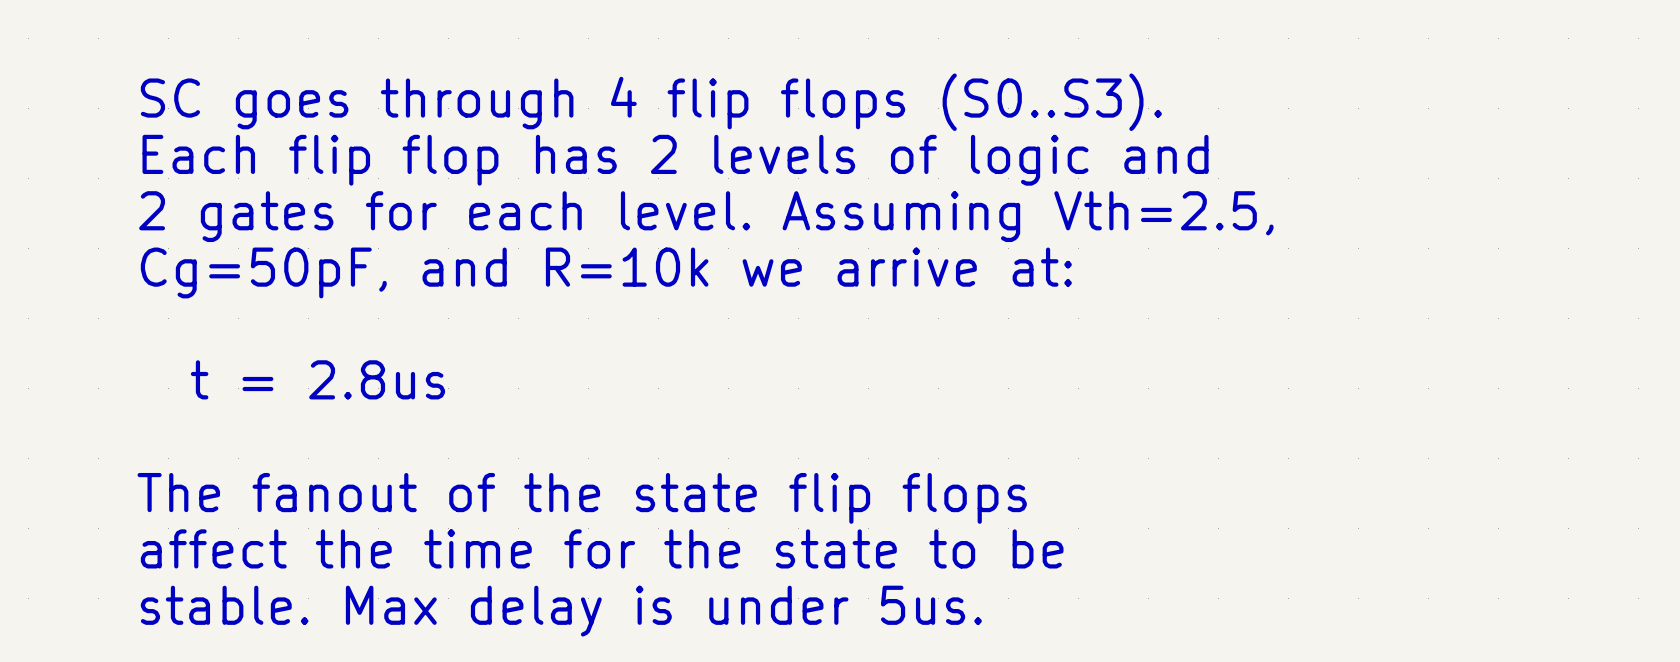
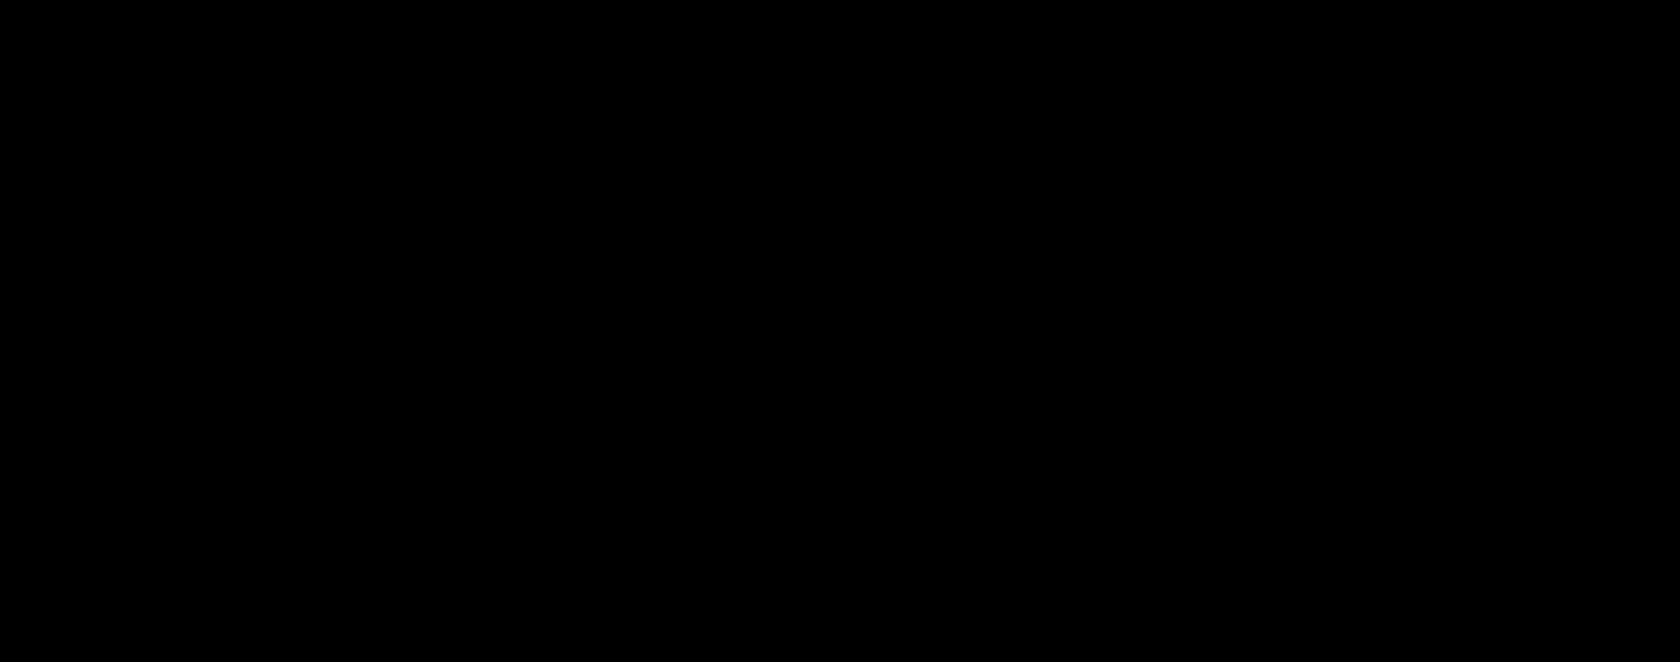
text: SC goes through 4 flip flops (S0..S3). (651, 102) -> none
text: Each flip flop has 2 levels of logic and (675, 160) -> none
text: 2 gates for each level. Assuming Vth=2.5, (706, 216) -> none
text: Cg=50pF, and R=10k we arrive at: (606, 272) -> none
text: t = 2.8us (317, 379) -> none
text: The fanout of the state flip flops (582, 498) -> none
text: affect the time for the state to be (602, 548) -> none
text: stable. Max delay is under 5us. (561, 611) -> none

